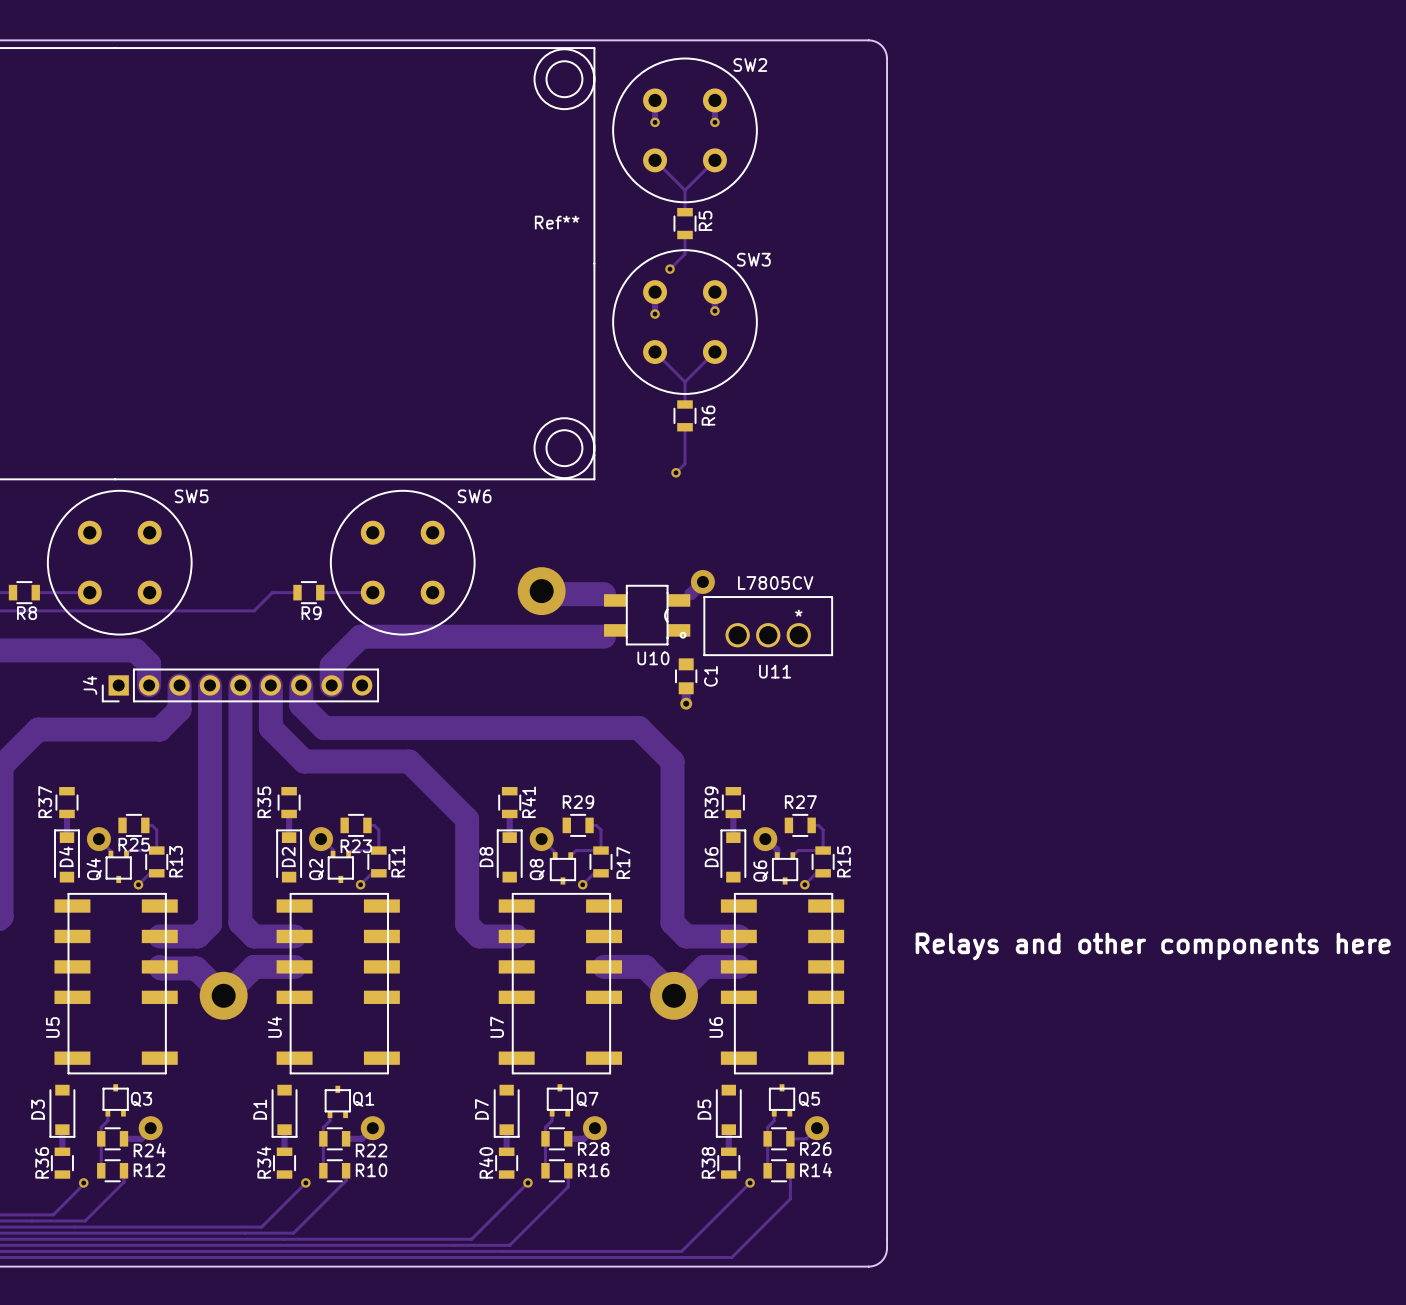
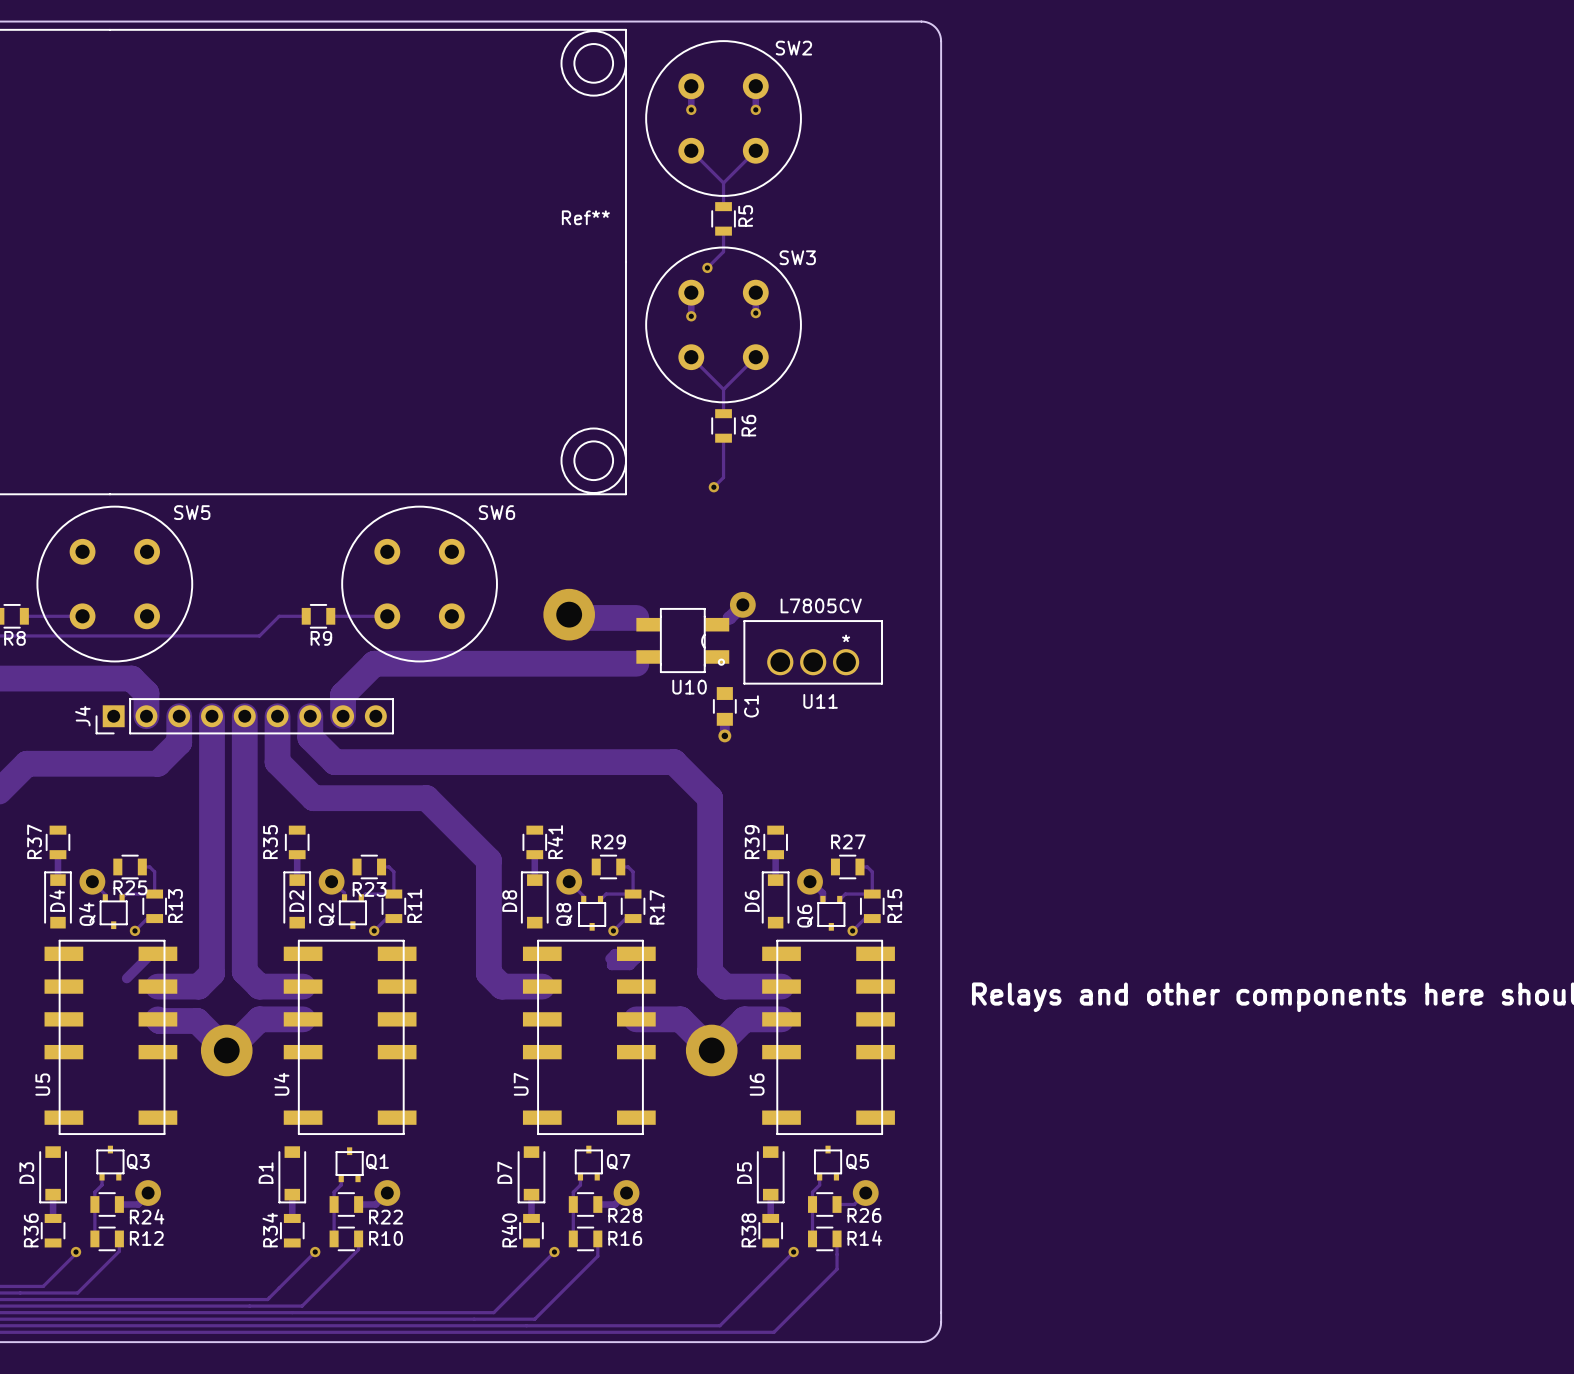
track: none -> (157, 953) (151, 953) (126, 978)
track: none -> (623, 953) (611, 965) (629, 965) (636, 958) (636, 953) (615, 953) (610, 958)

